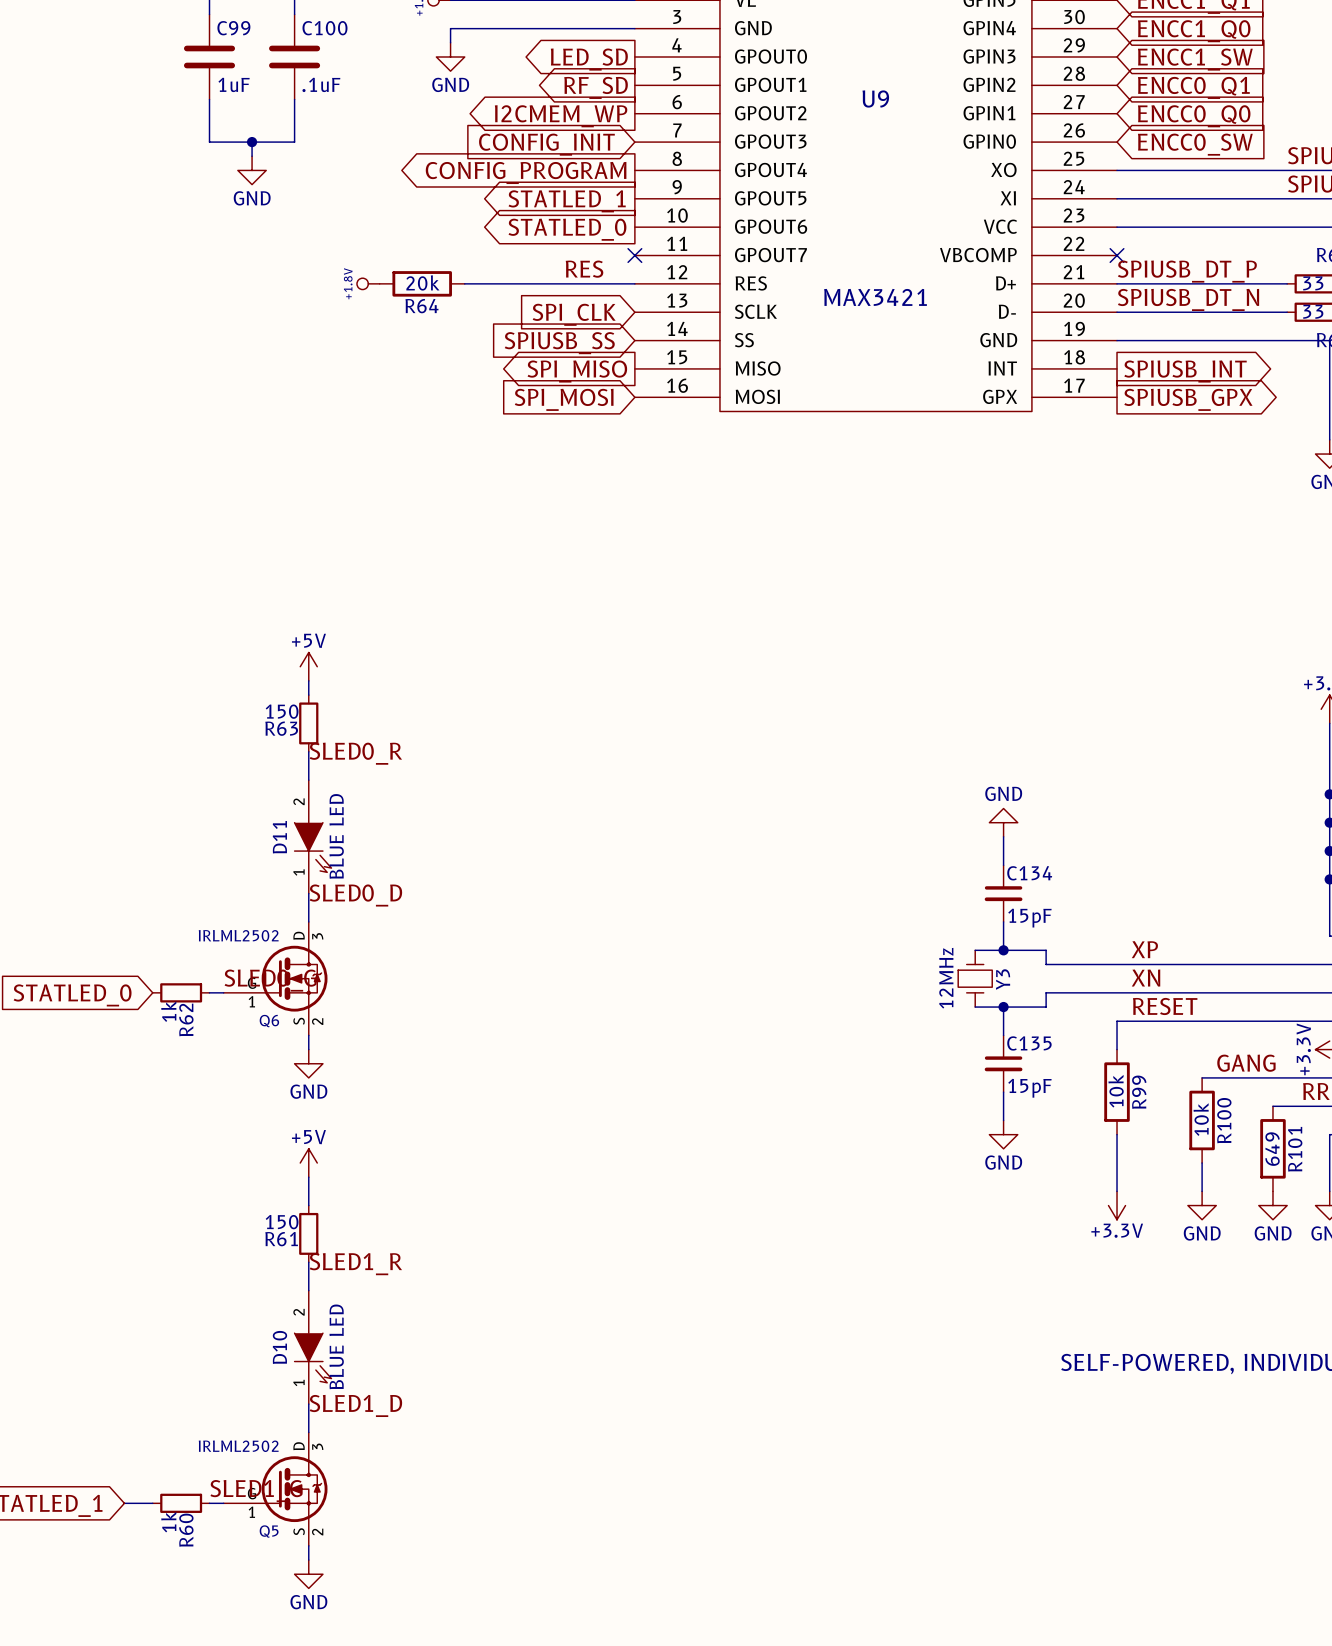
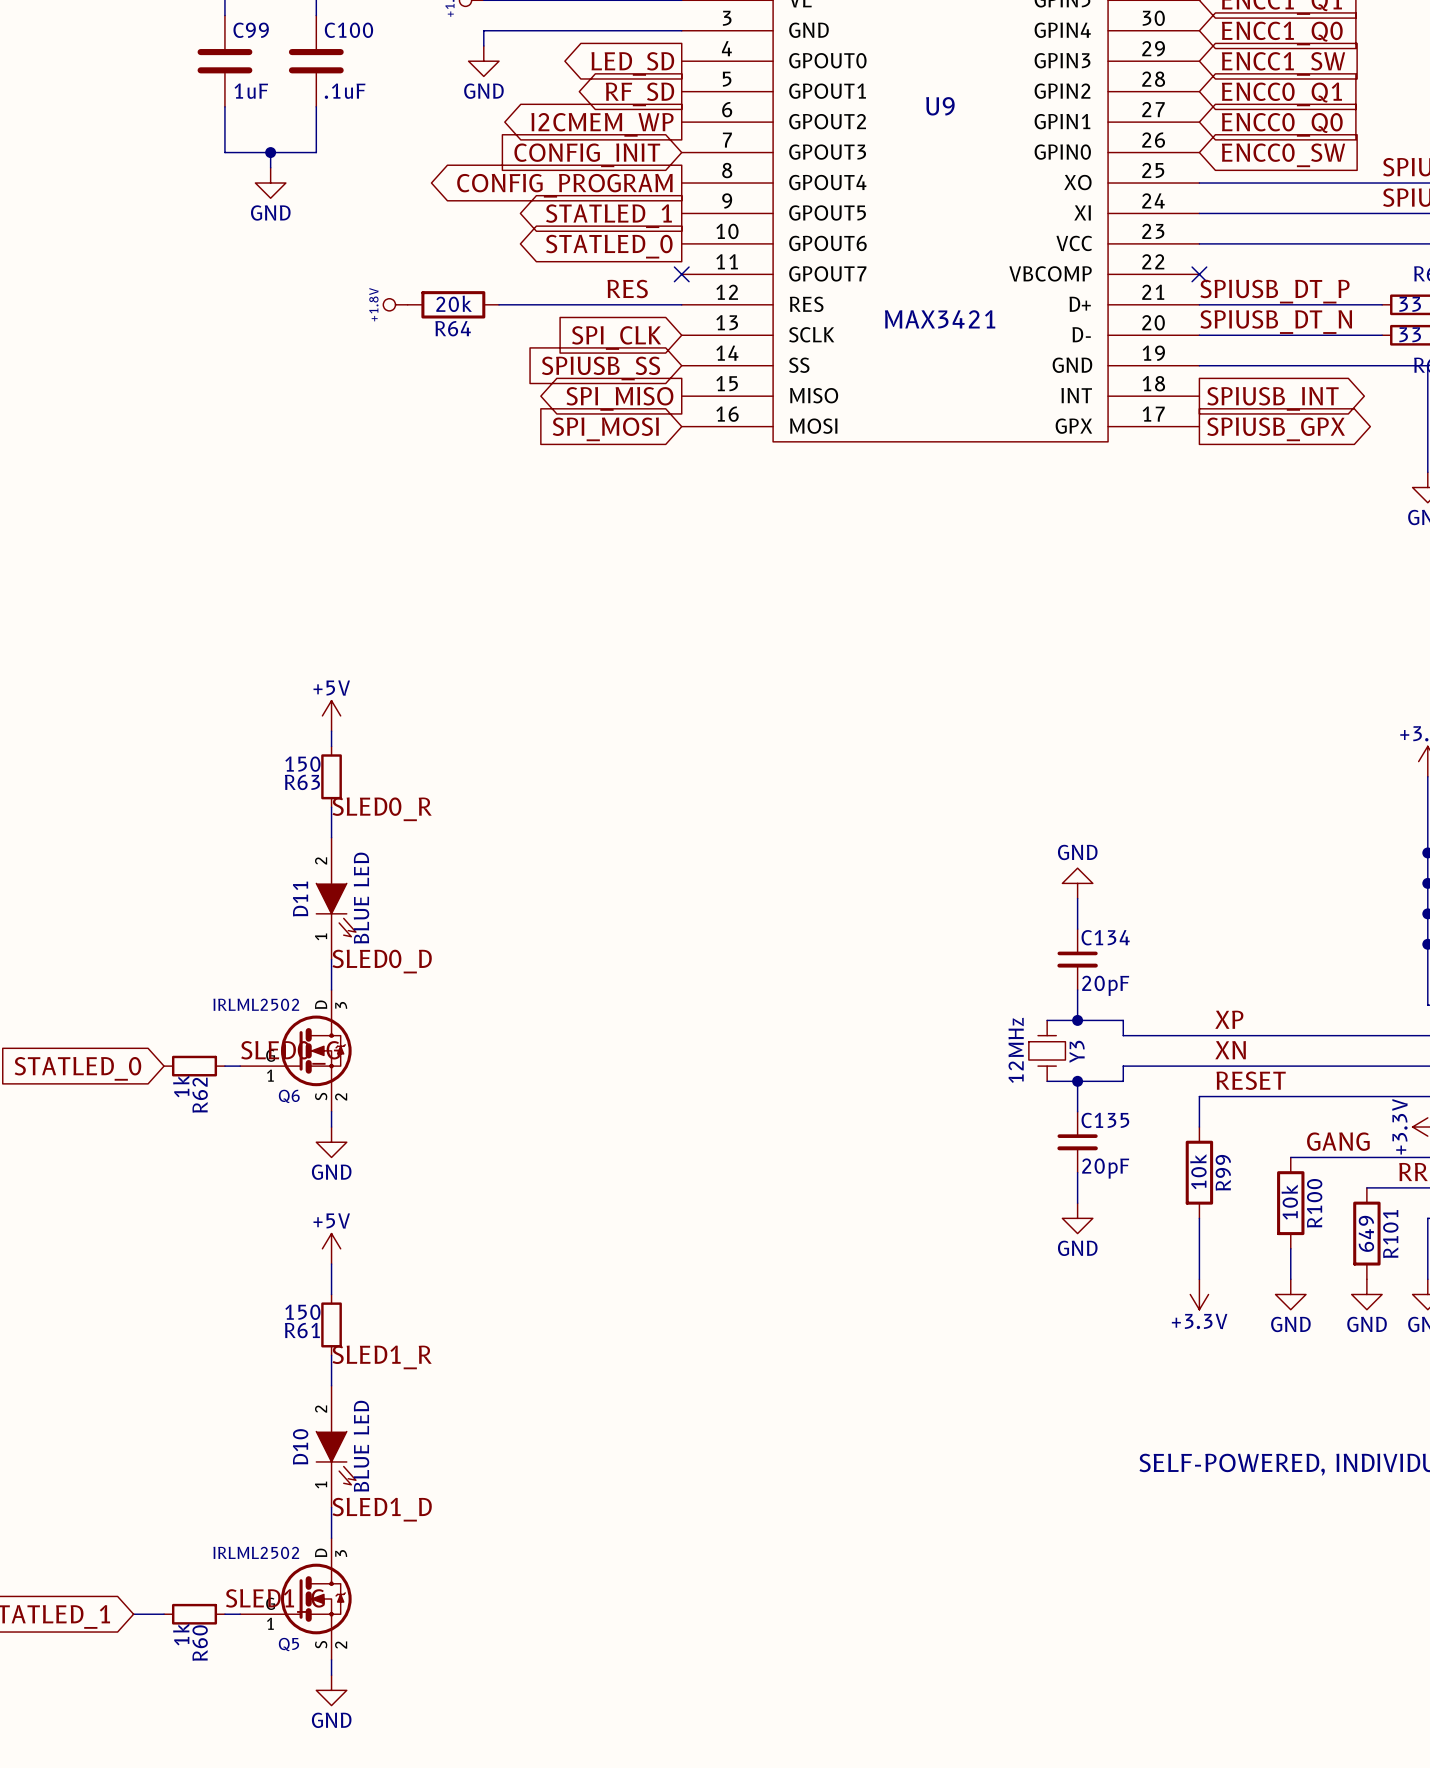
C134 value: 15pF (1029, 918) -> 20pF (1105, 985)
C135 value: 15pF (1029, 1088) -> 20pF (1105, 1168)

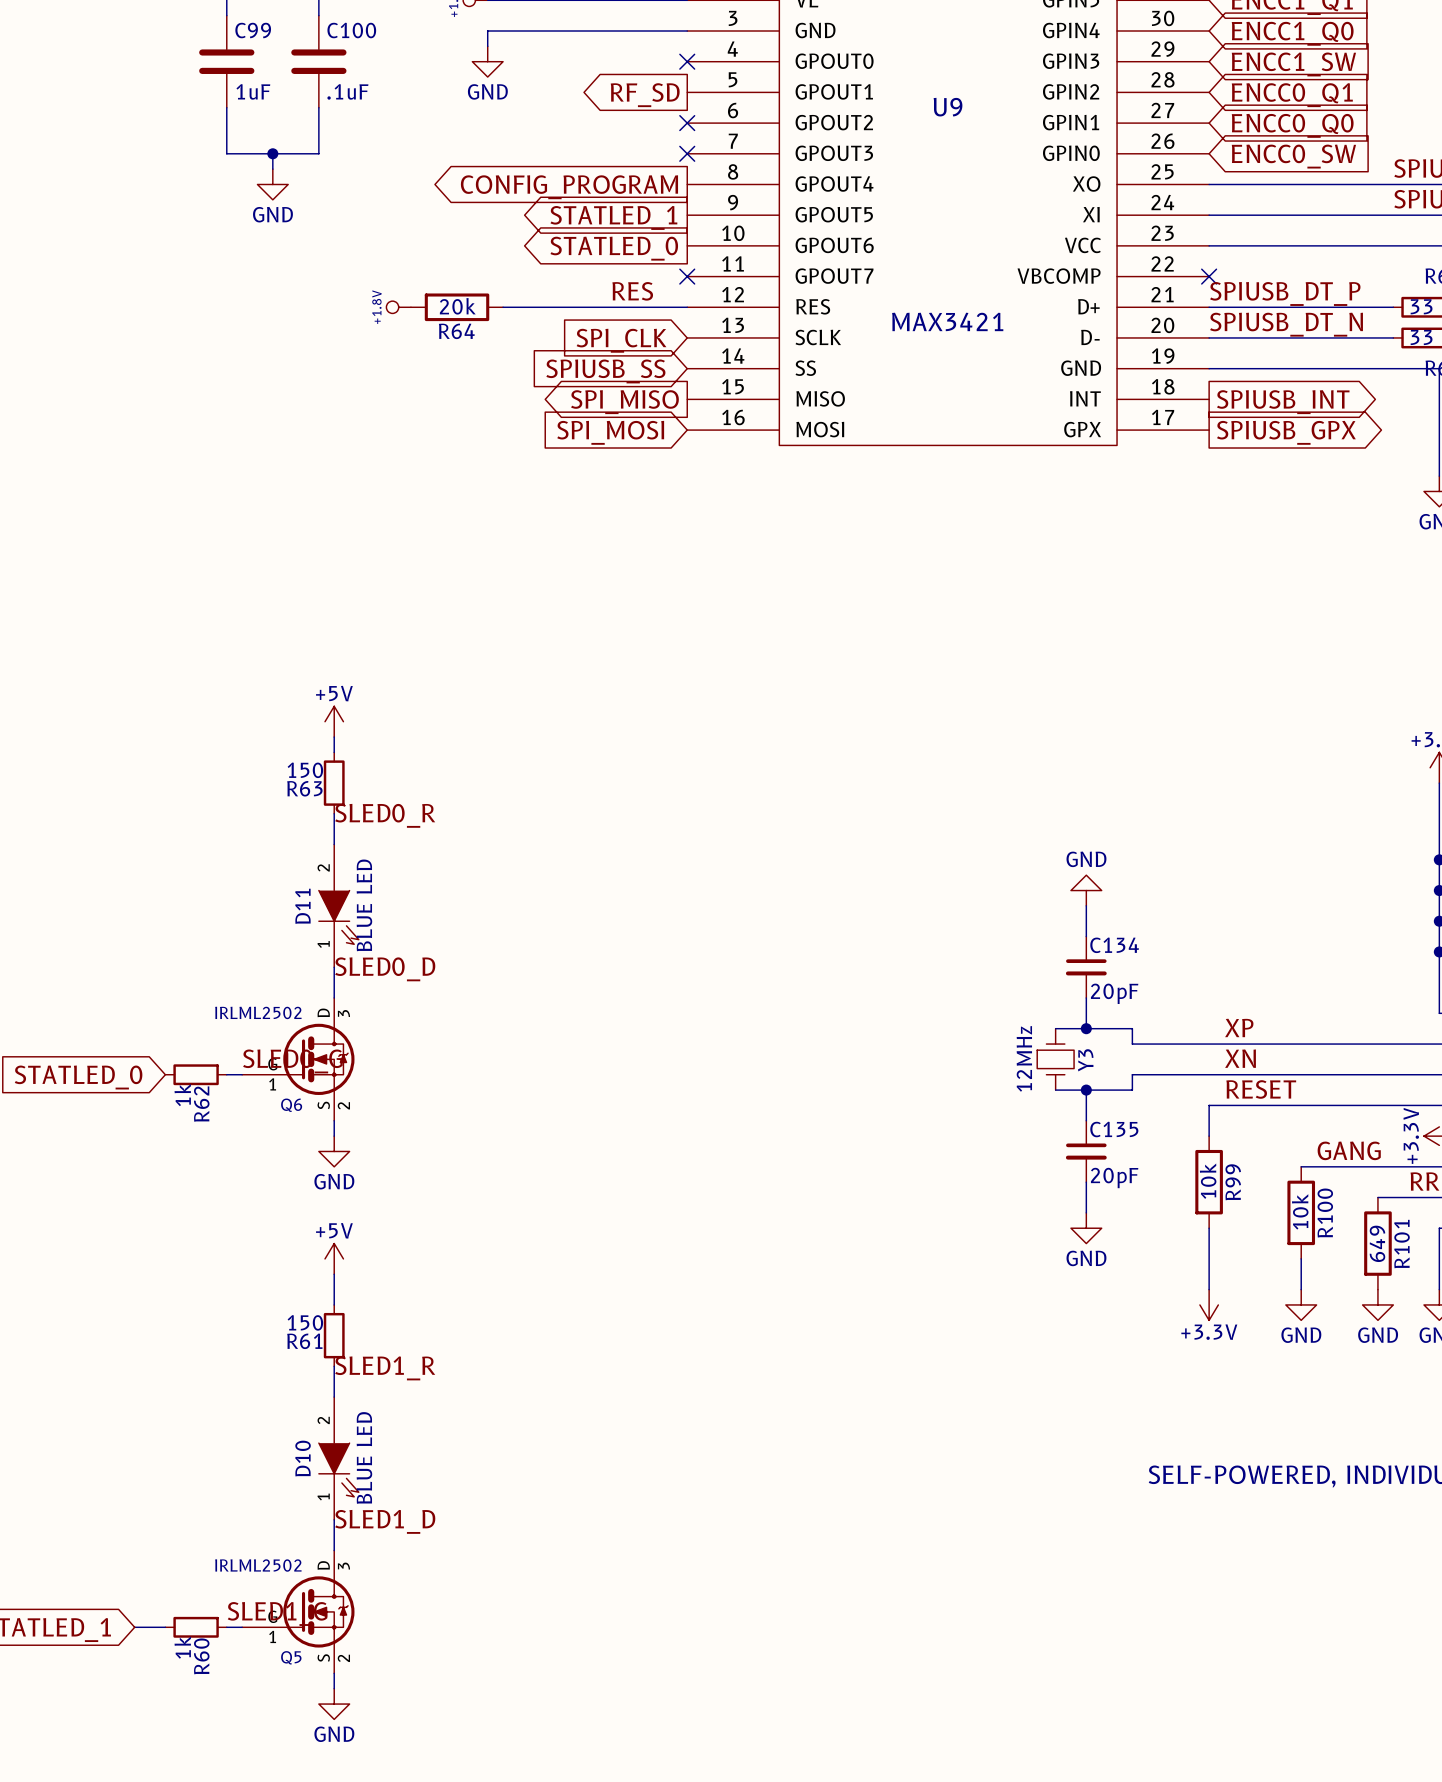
no-connect mark: none -> (687, 61)
global label: LED_SD (632, 63) -> none
no-connect mark: none -> (687, 123)
global label: I2CMEM_WP (602, 124) -> none
no-connect mark: none -> (687, 153)
global label: CONFIG_INIT (587, 155) -> none

